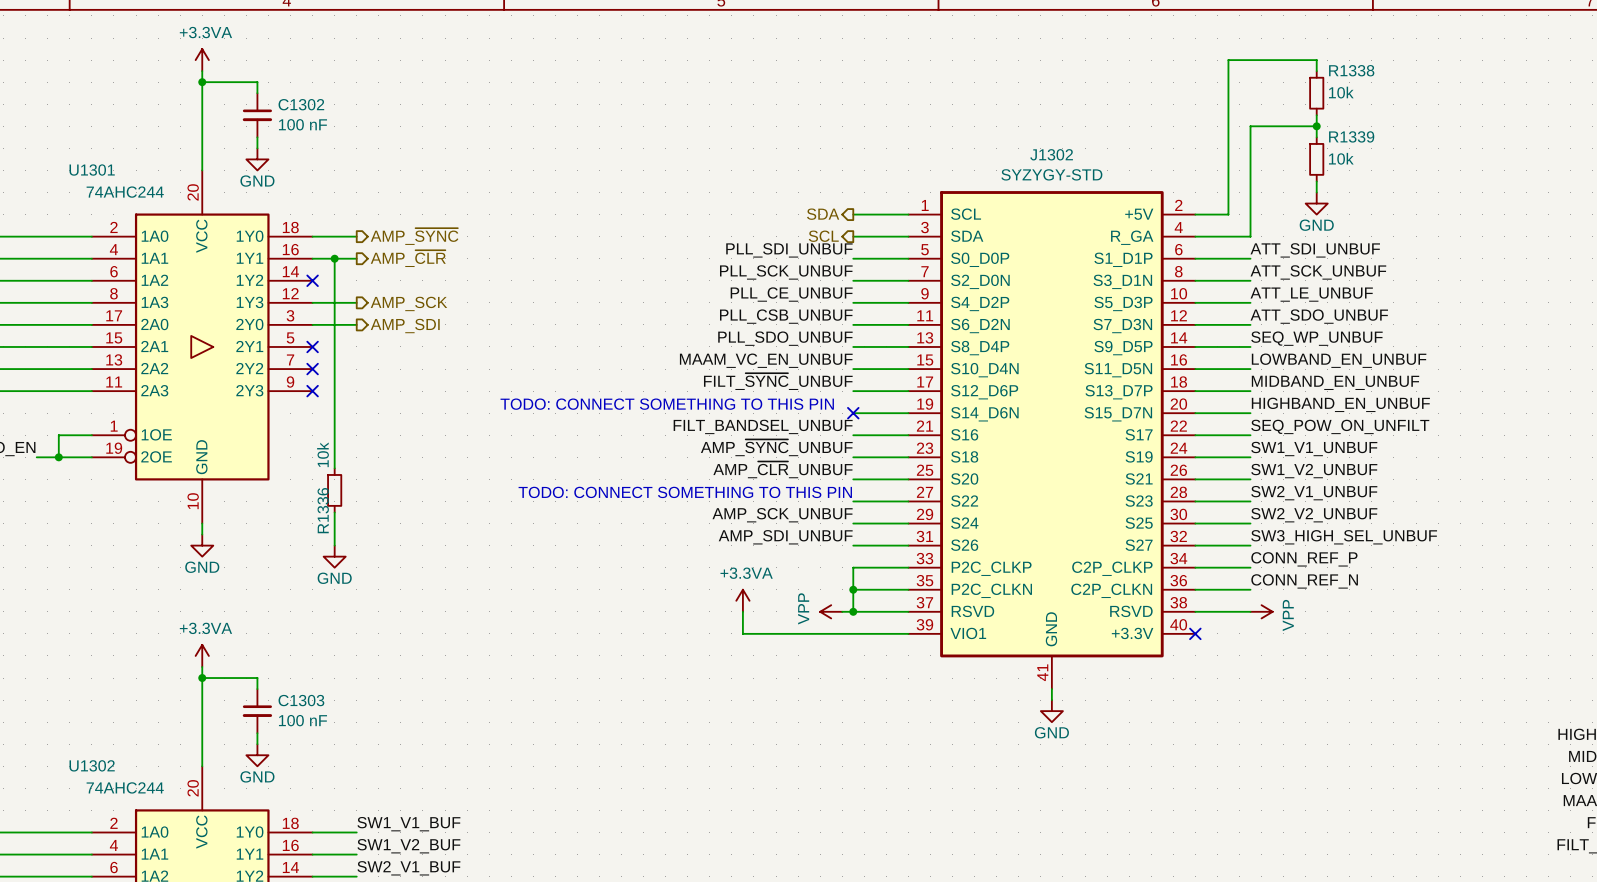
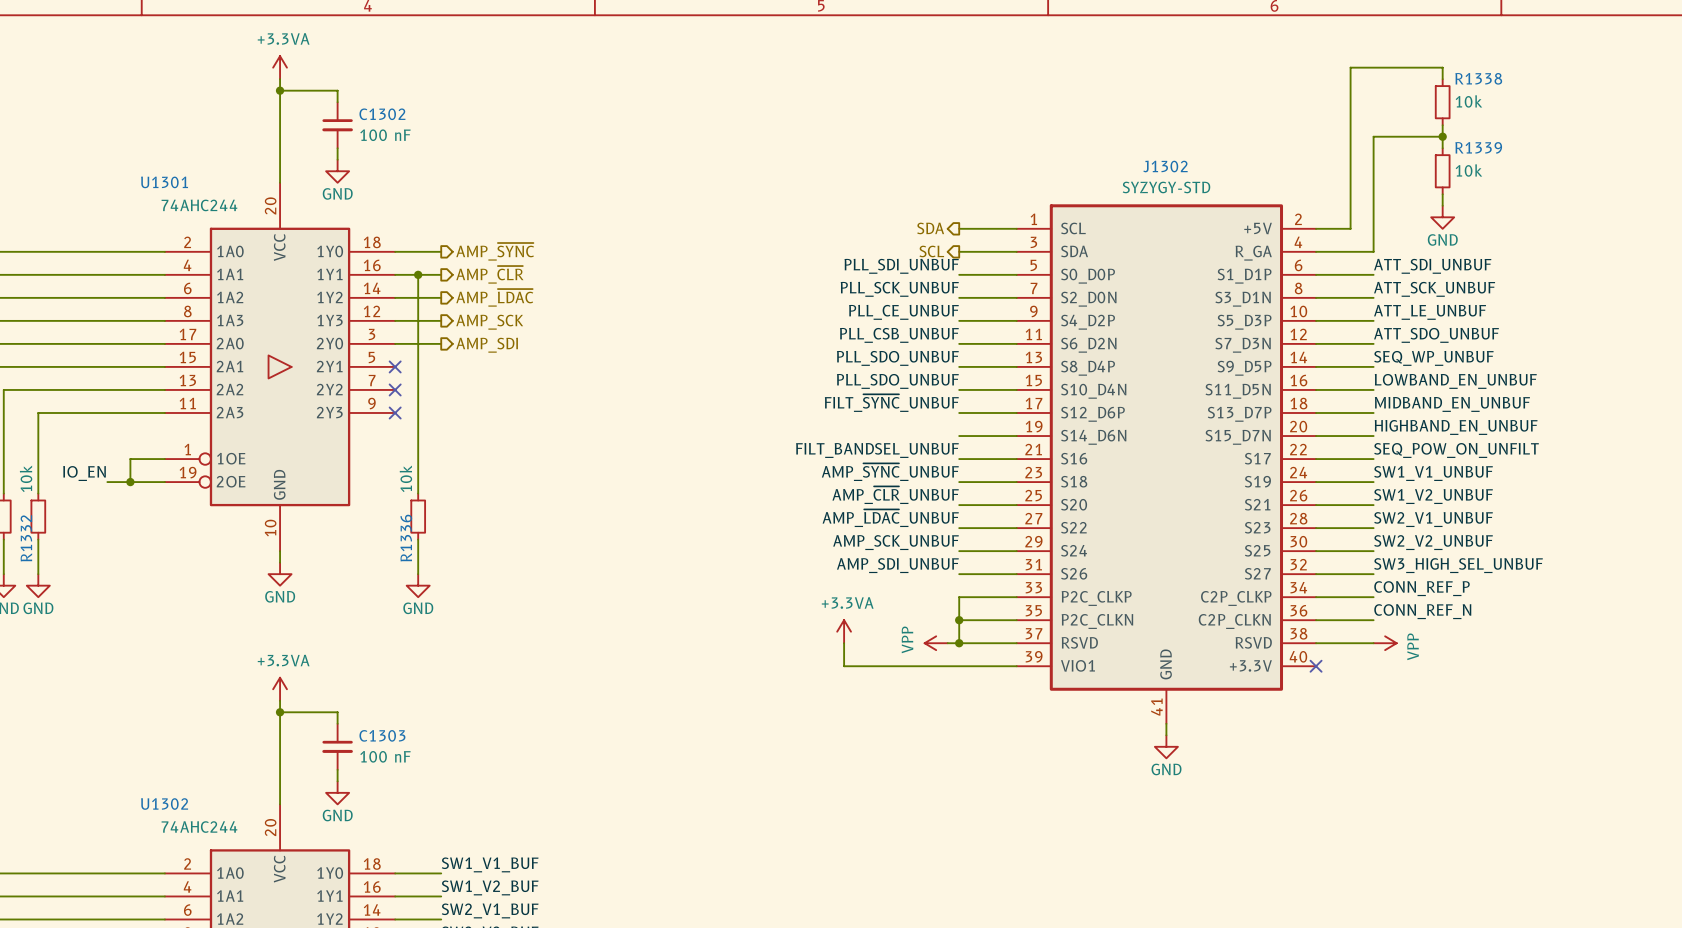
wire: none -> (395, 297) (441, 297)
no-connect mark: (312, 280) -> none
hierarchical label: none -> AMP_~{LDAC} (494, 297)
label: MAAM_VC_EN_UNBUF (766, 360) -> PLL_SDO_UNBUF (897, 381)
text: TODO: CONNECT SOMETHING TO THIS PIN (667, 404) -> none
no-connect mark: (853, 413) -> none
label: none -> AMP_~{LDAC}_UNBUF (890, 518)
text: TODO: CONNECT SOMETHING TO THIS PIN (685, 492) -> none

